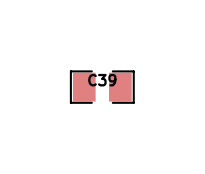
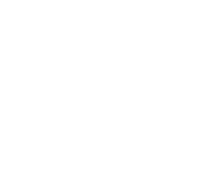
C39: (102, 87) -> none

